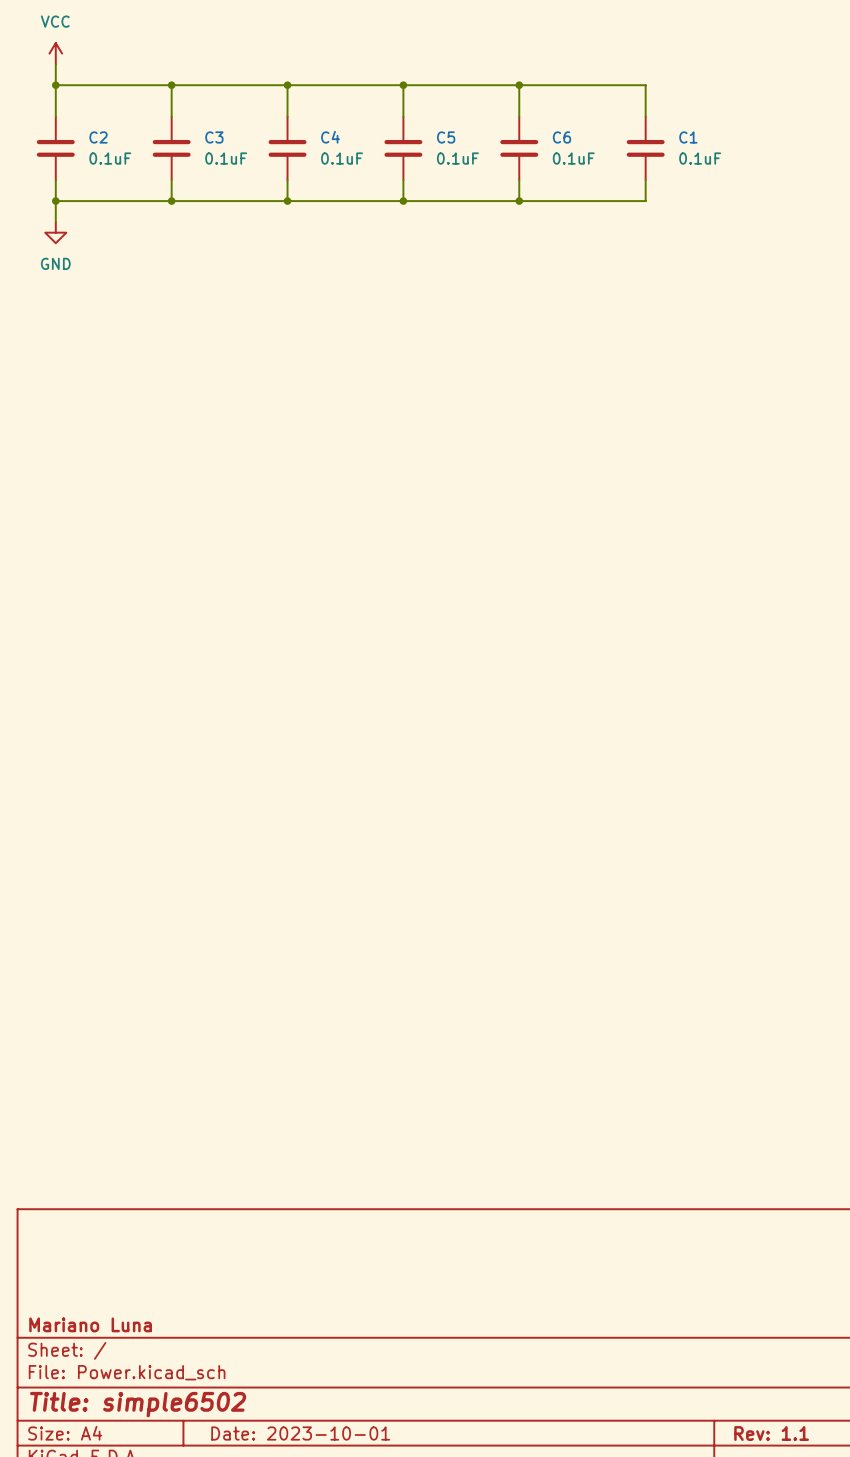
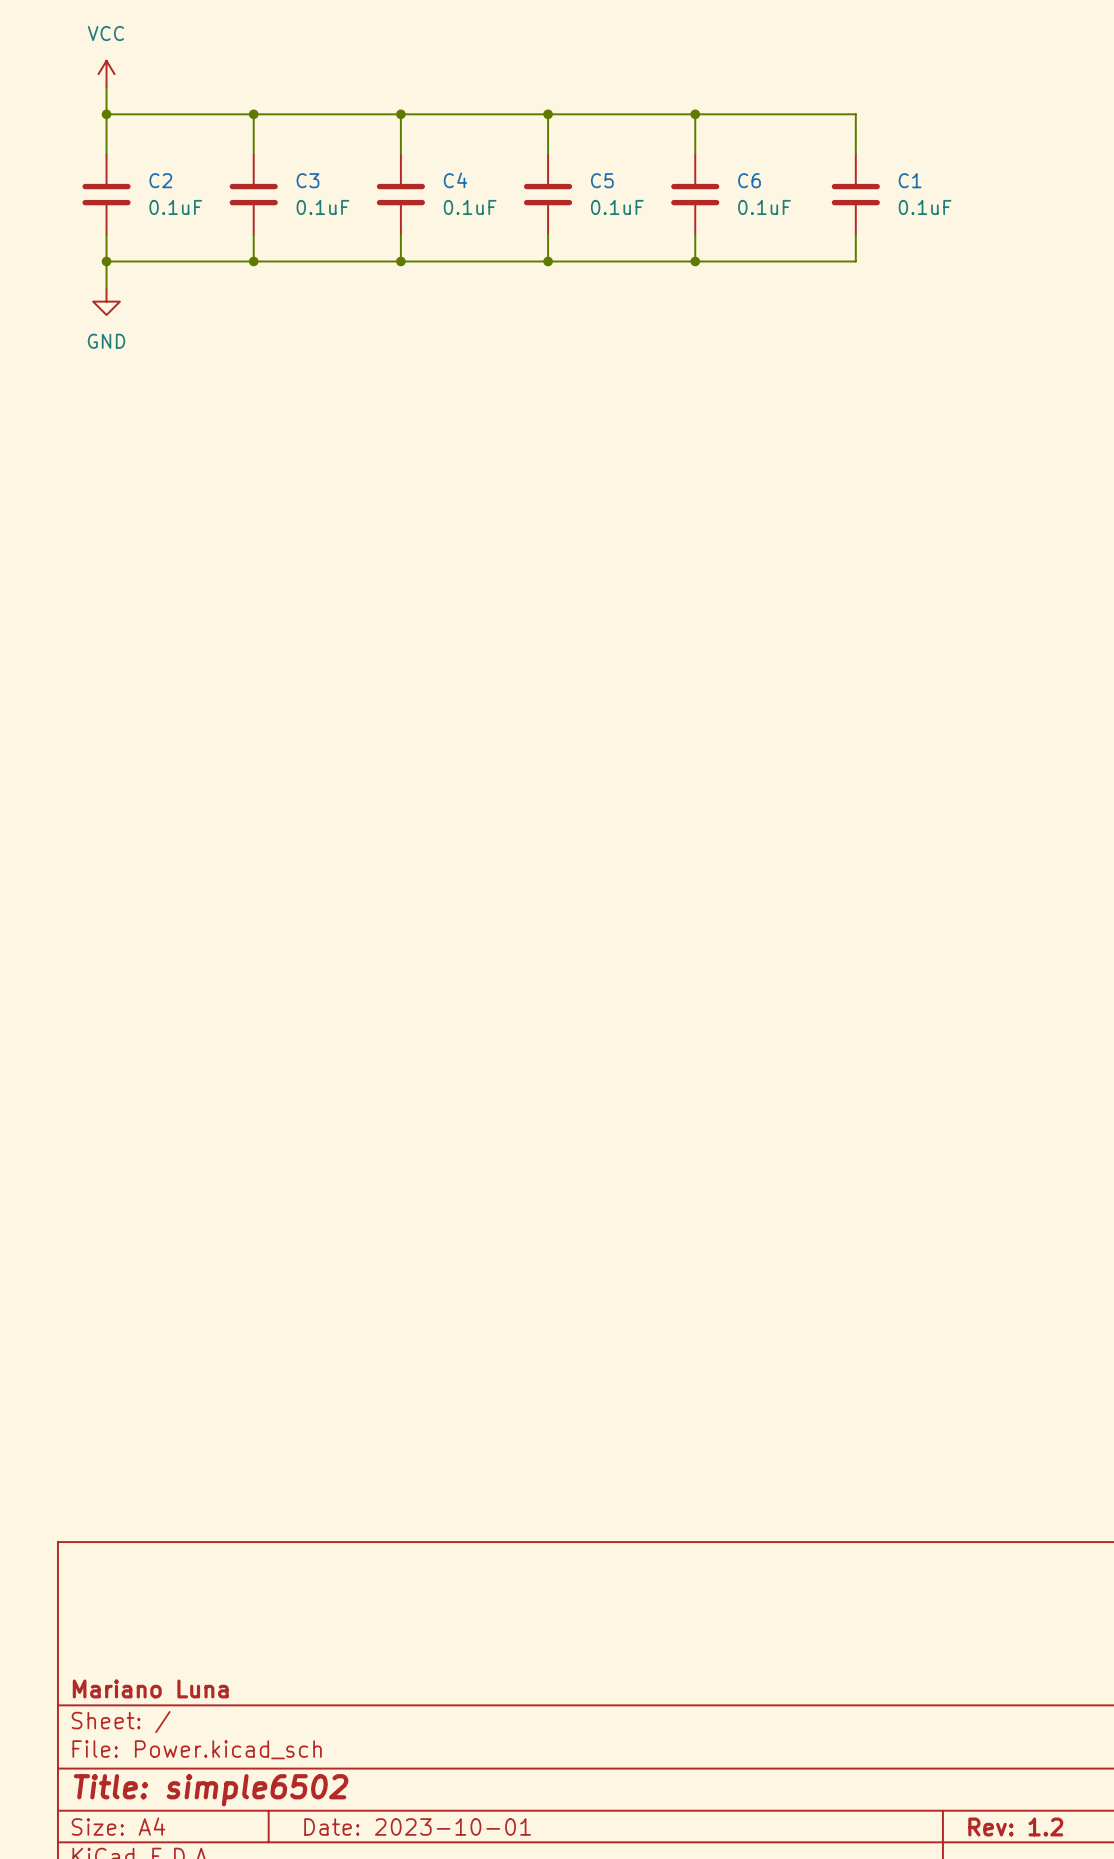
title block: Rev: 1.1 (771, 1433) -> Rev: 1.2 (1015, 1826)

